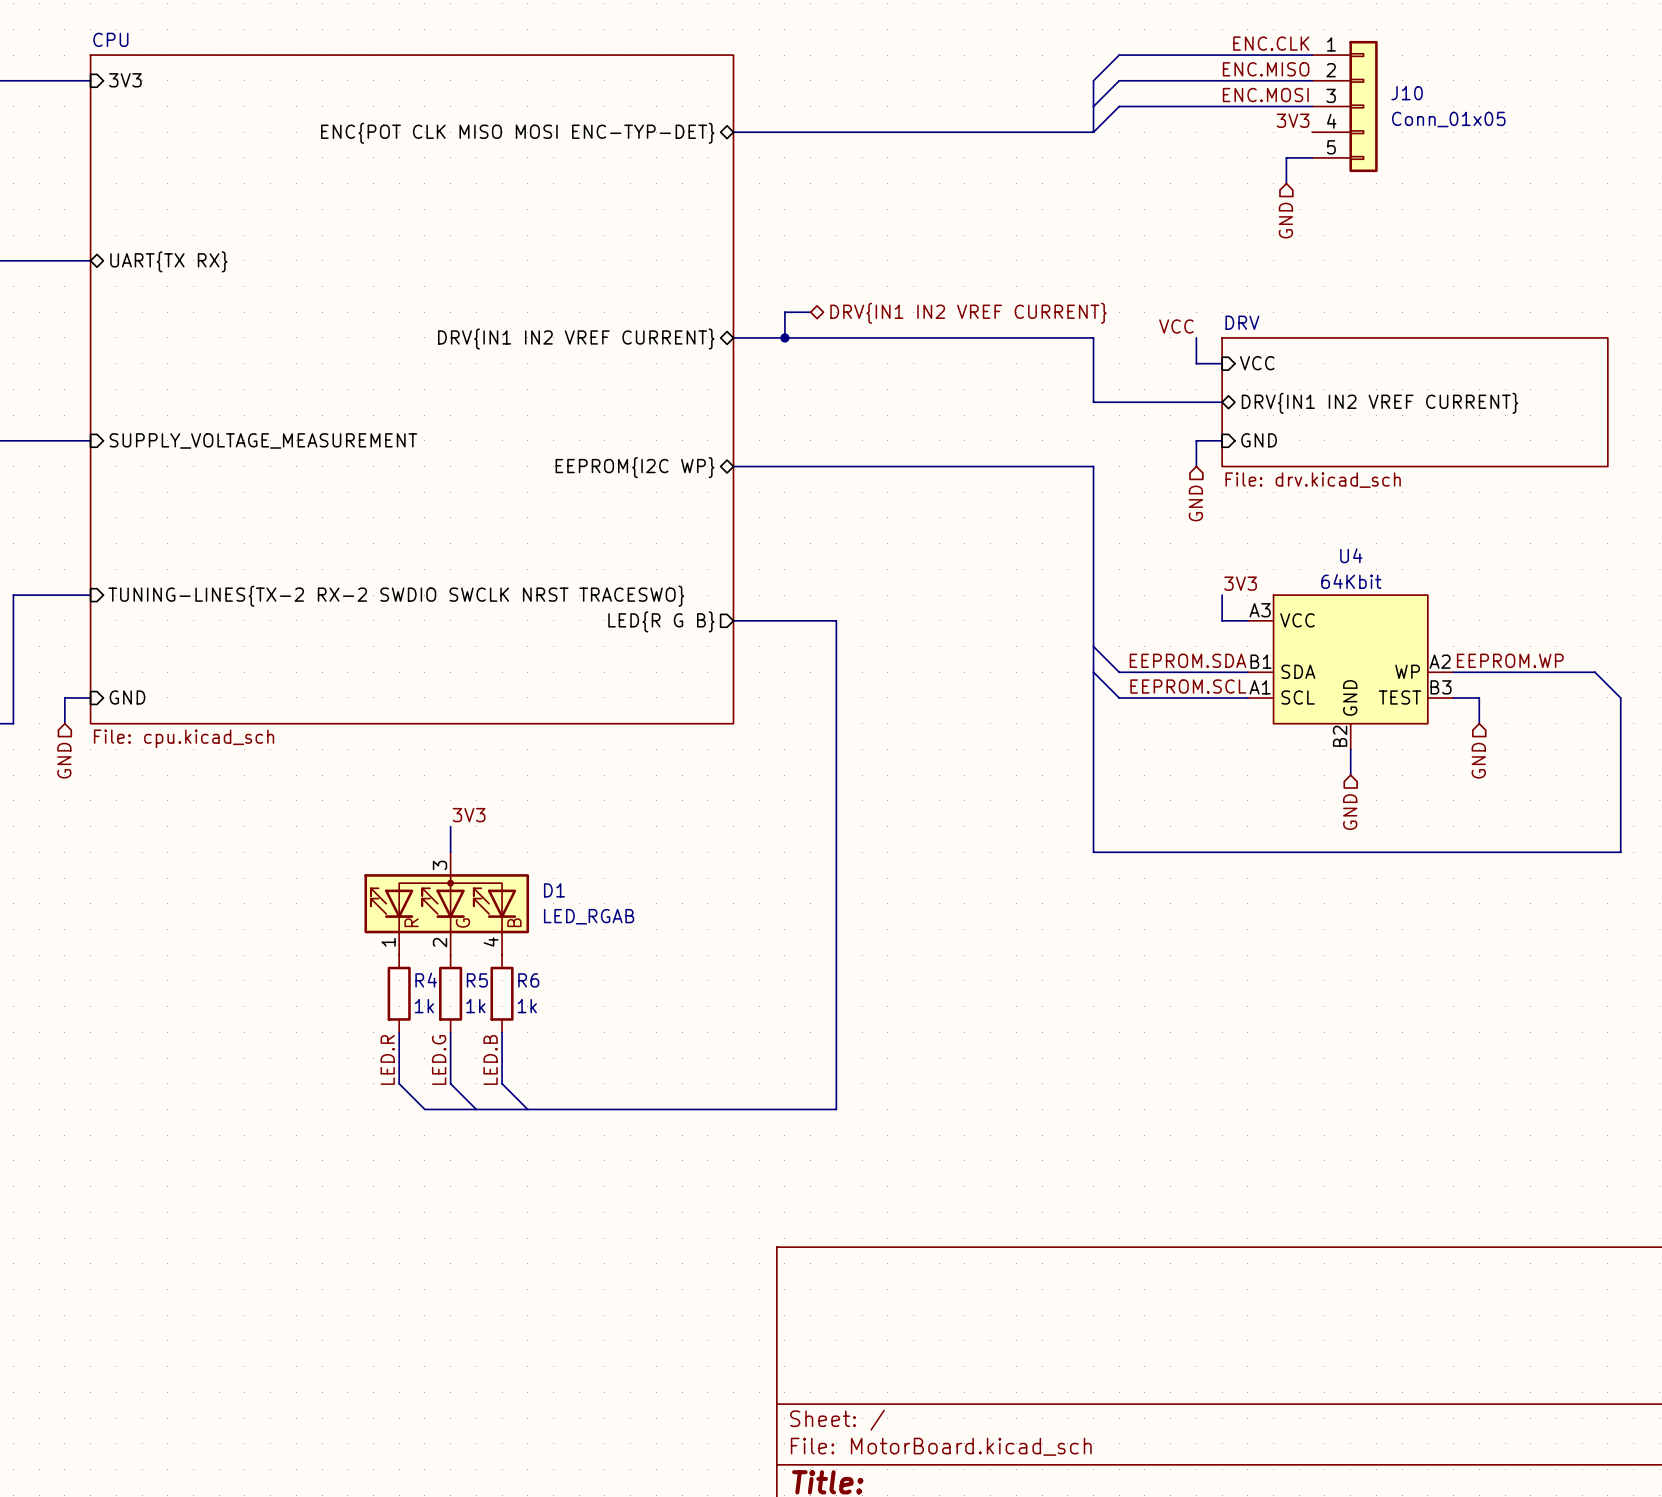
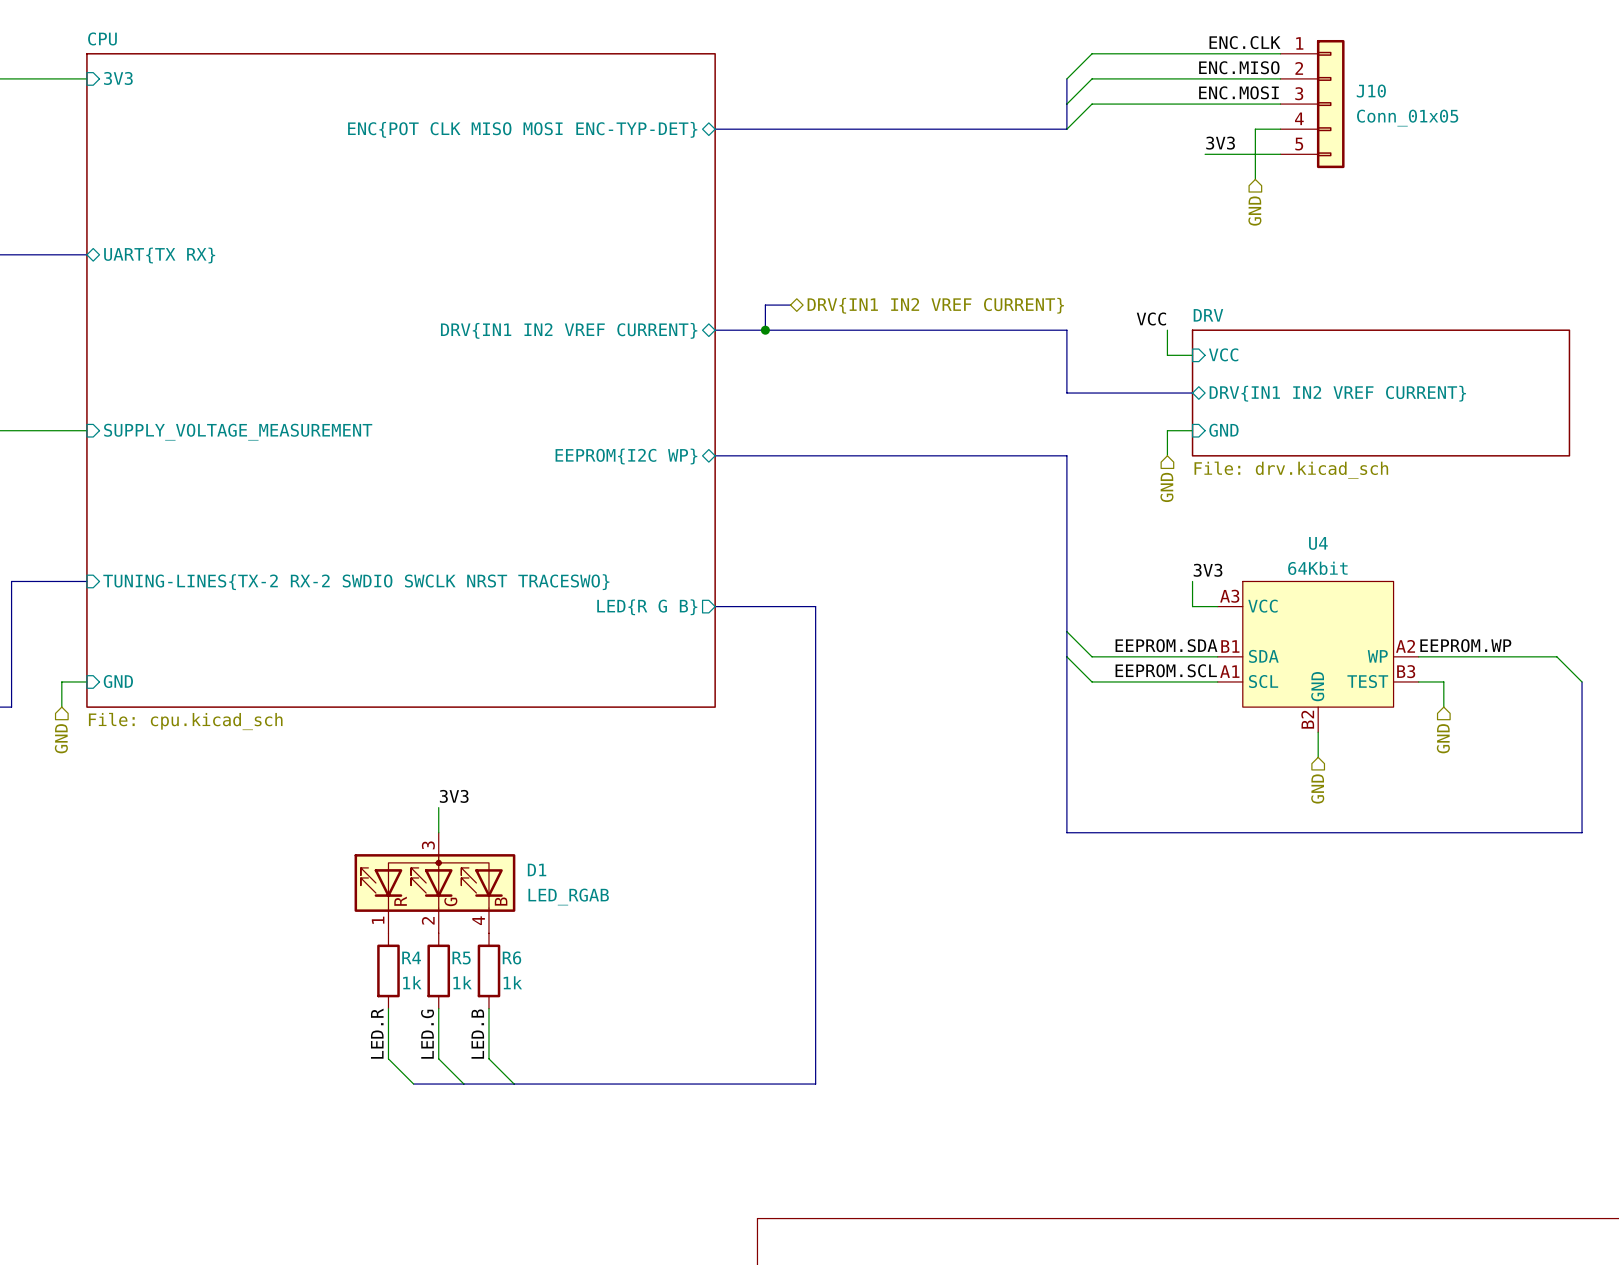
label position: 3V3 (1293, 120) -> 3V3 (1220, 143)
wire: none -> (1280, 129) (1255, 129) (1255, 154) (1205, 154)

